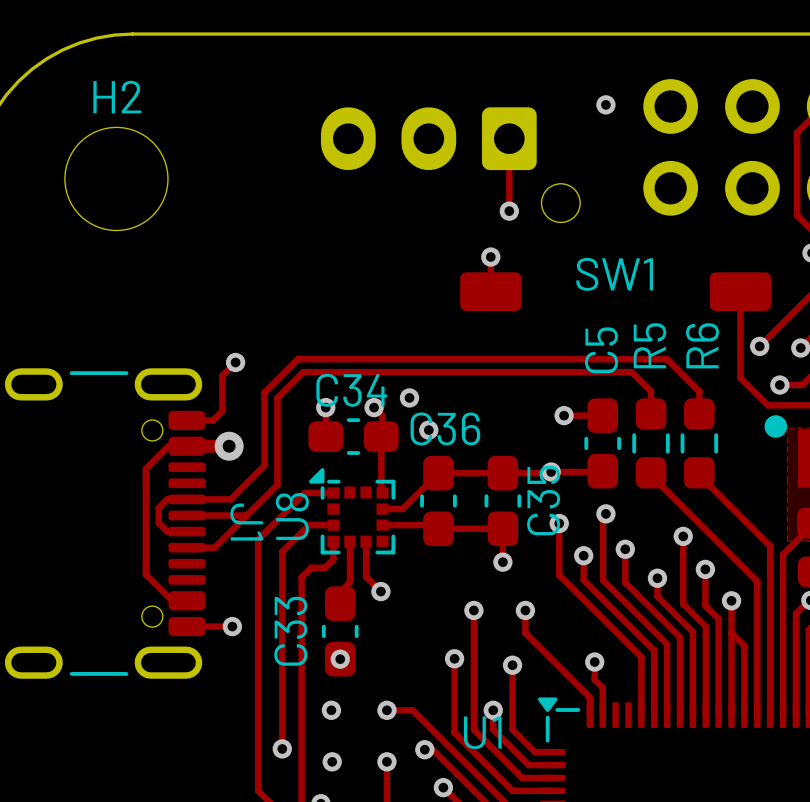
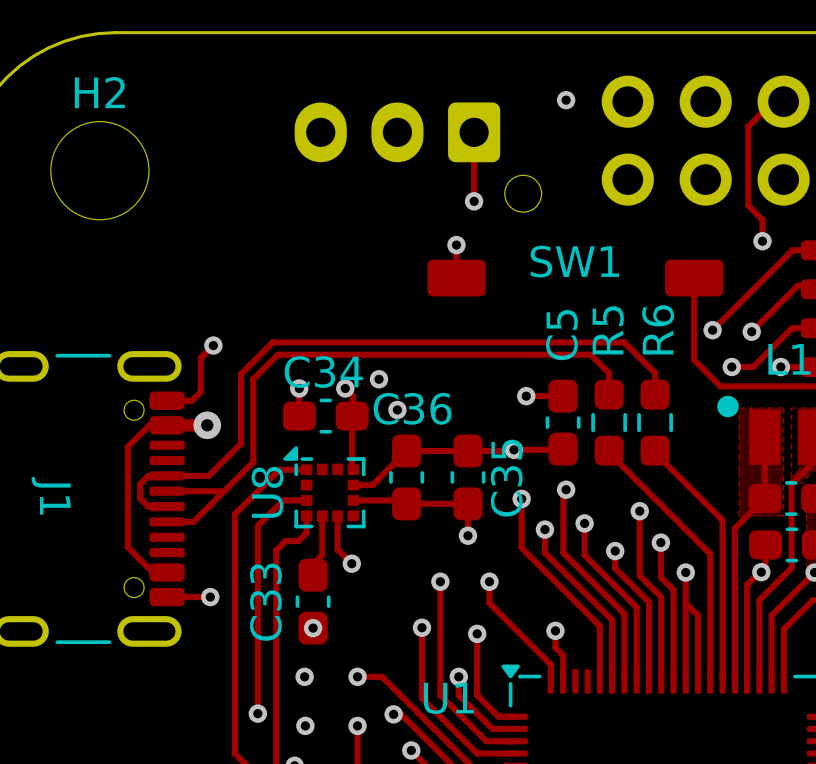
J1 name position: J1 (246, 522) -> J1 (51, 495)

